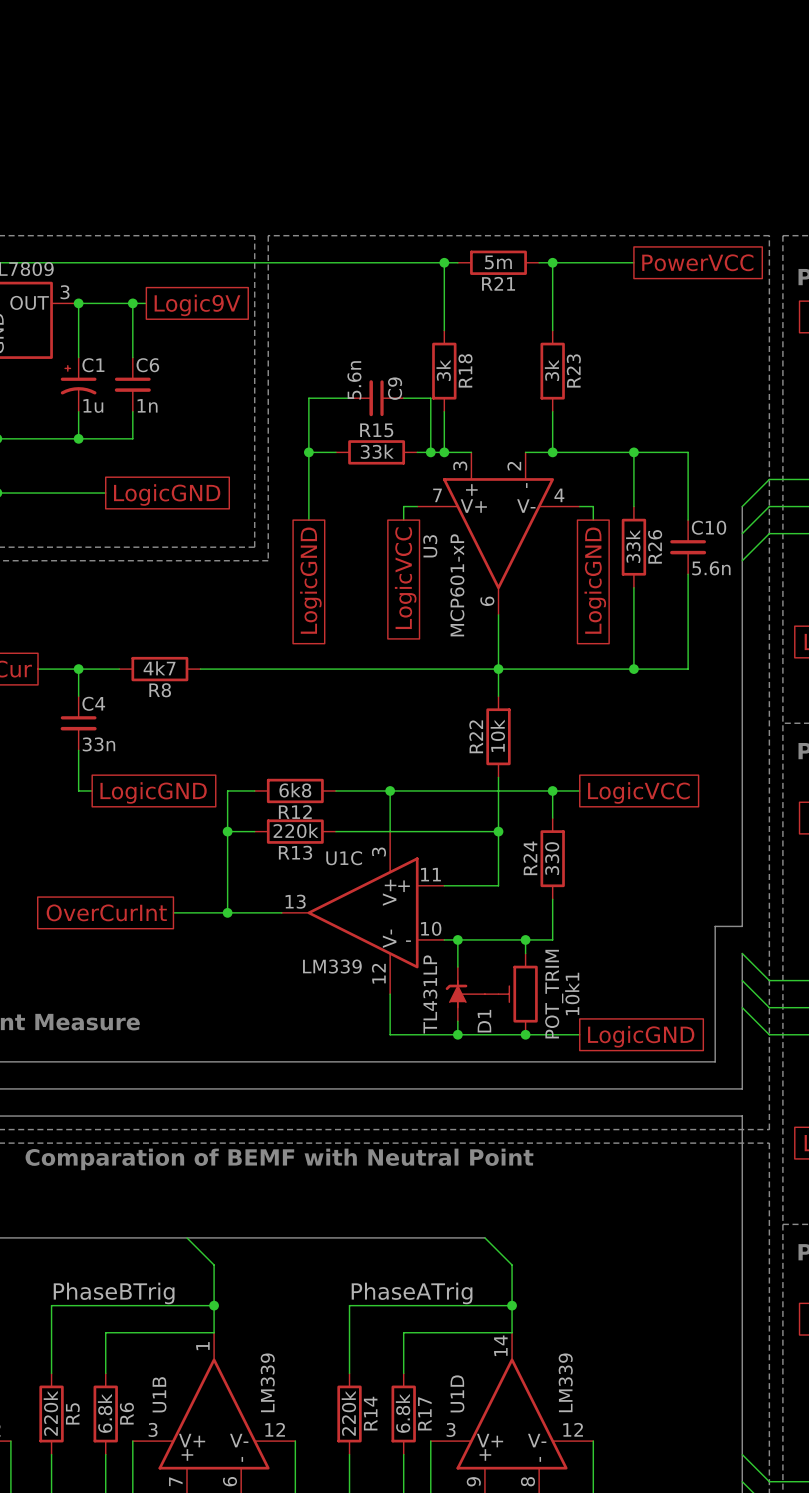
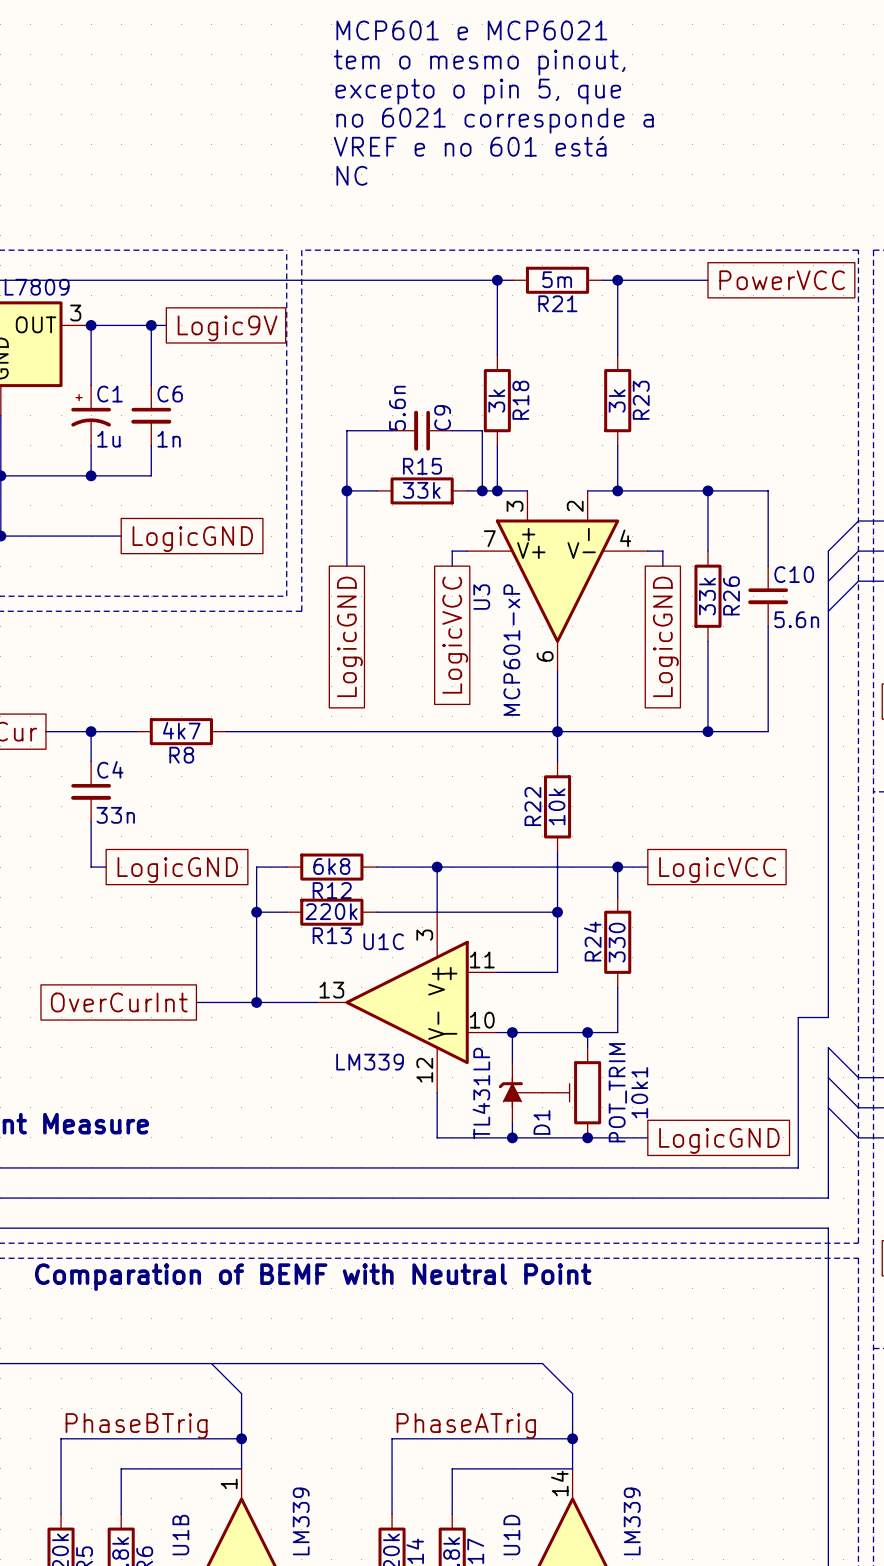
text: none -> MCP601 e MCP6021 (471, 30)
text: none -> tem o mesmo pinout, (479, 62)
text: none -> excepto o pin 5, que (478, 91)
text: none -> no 6021 corresponde a (495, 120)
text: none -> VREF e no 601 está (470, 146)
text: none -> NC (351, 175)

